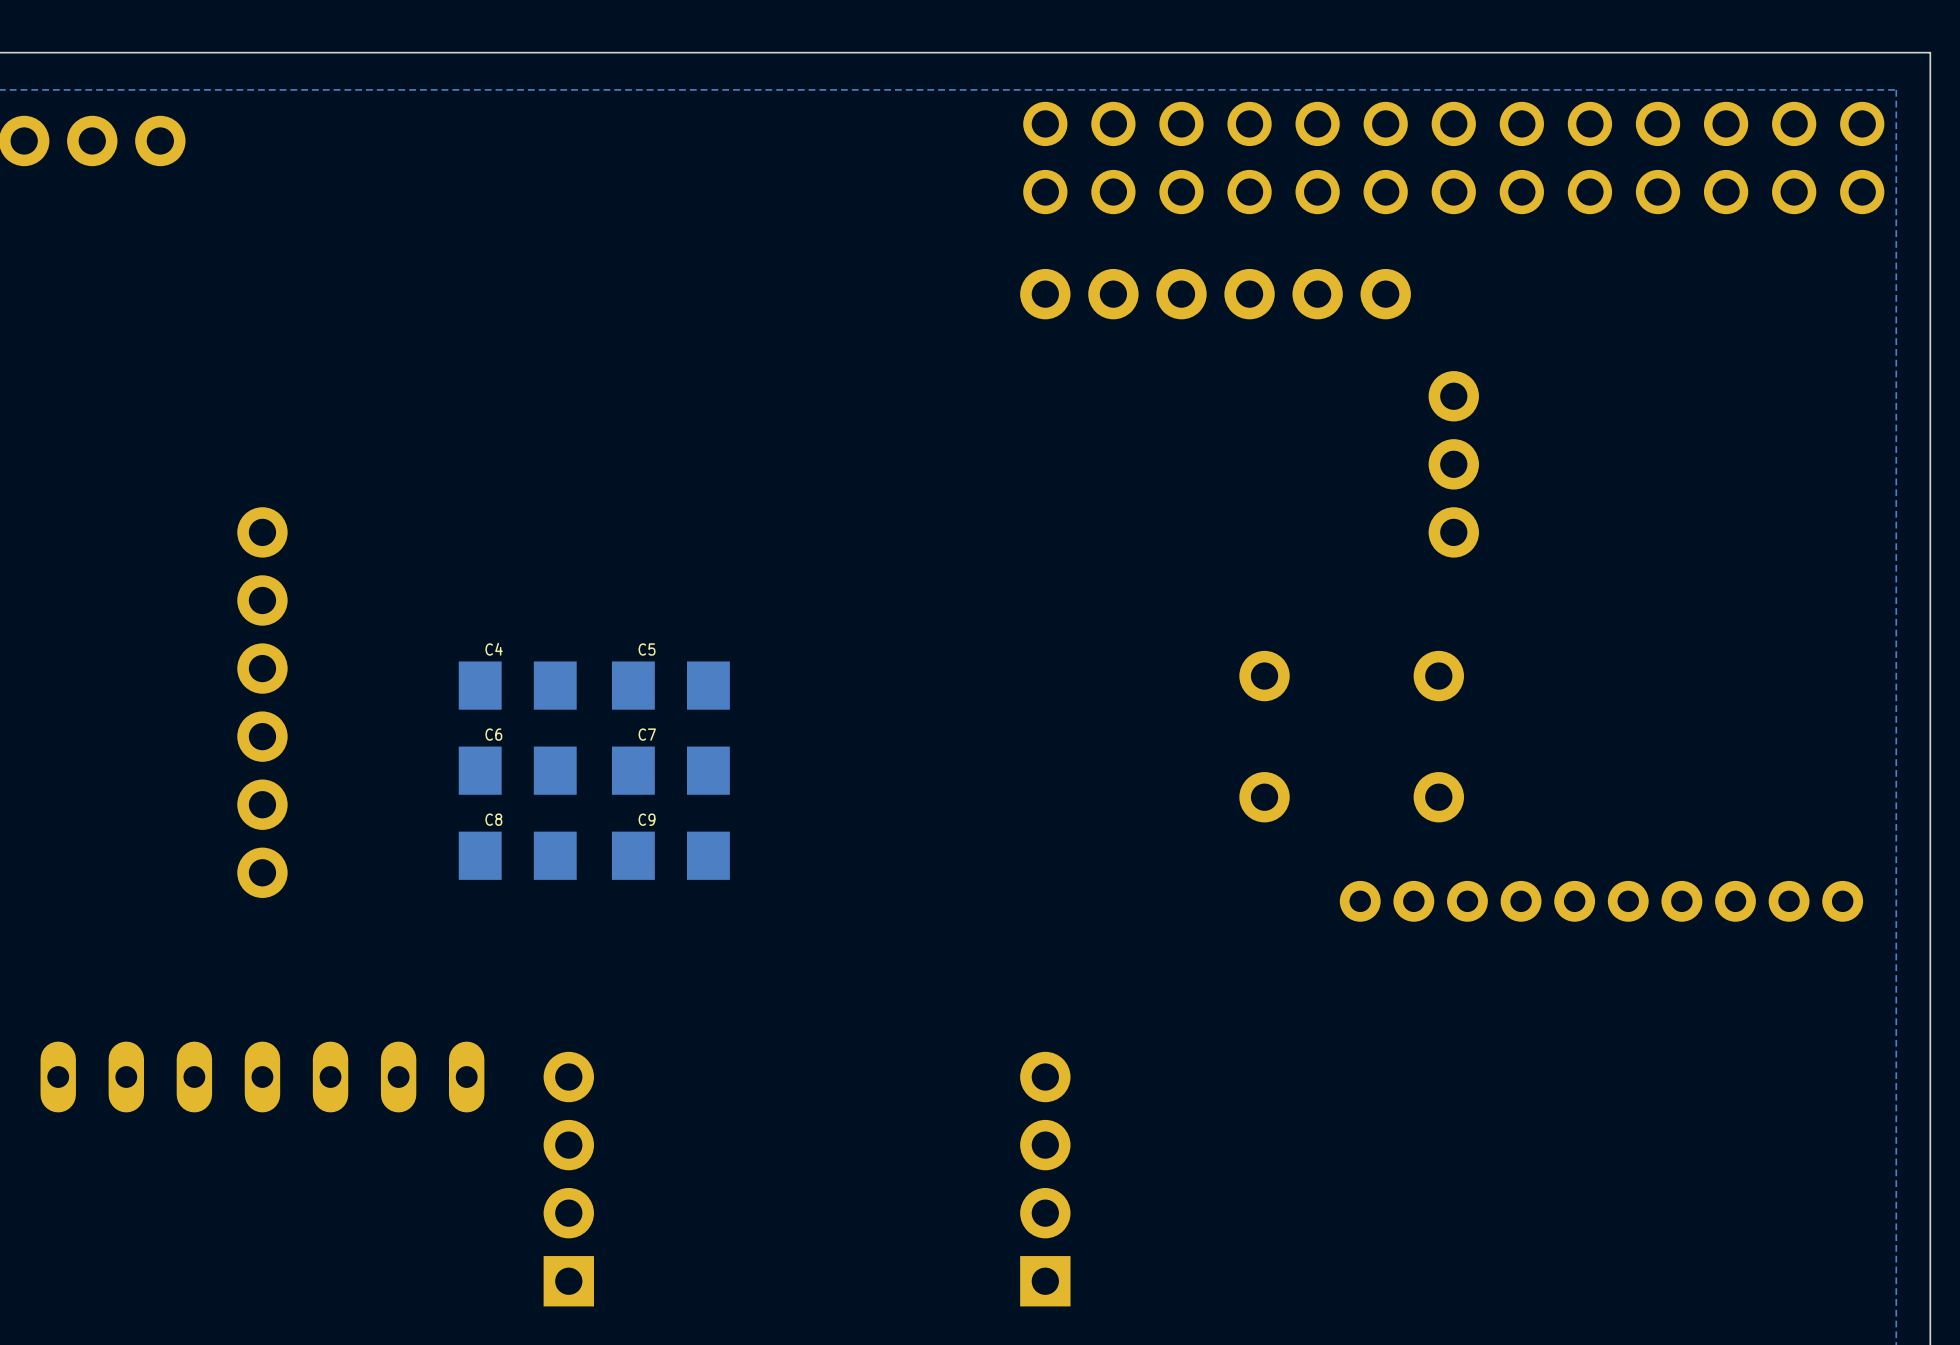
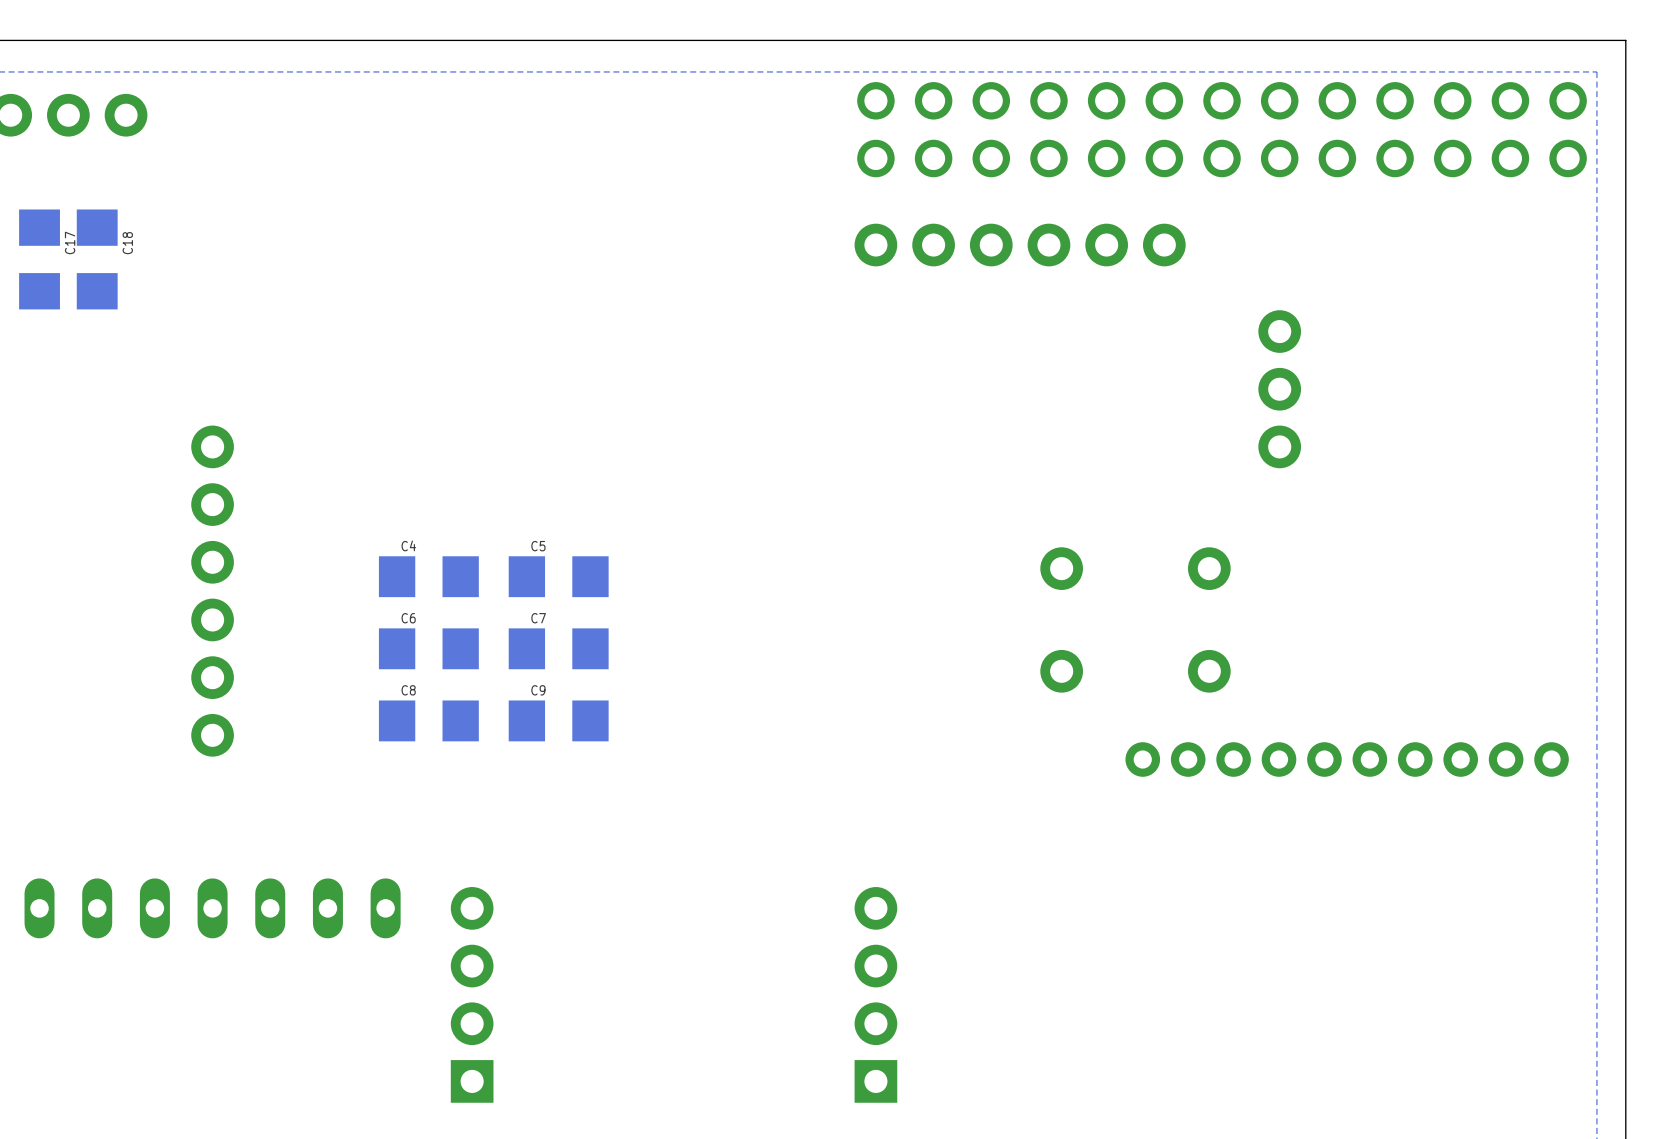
C17: none -> (39, 259)
C18: none -> (97, 259)
part position: (1453, 464) -> (1279, 389)

